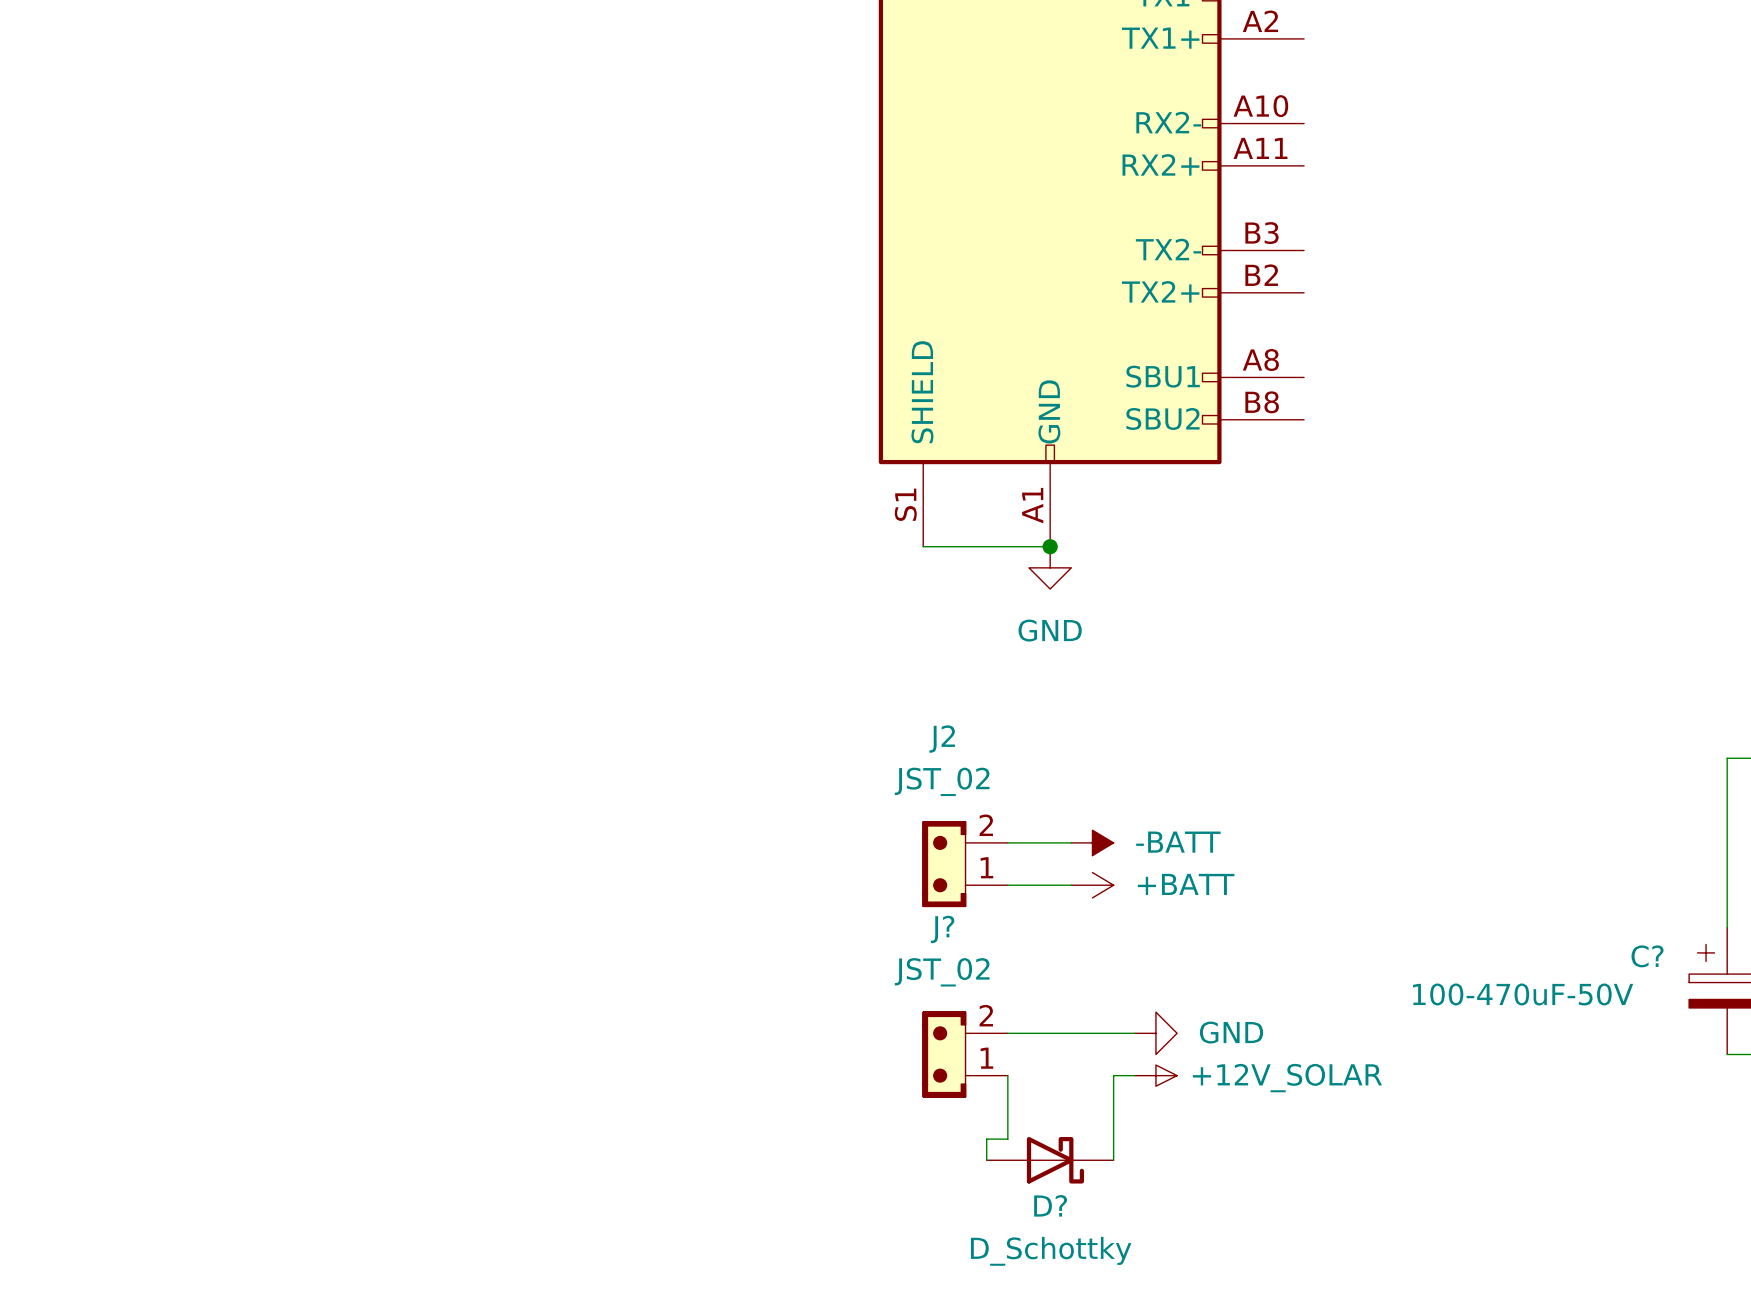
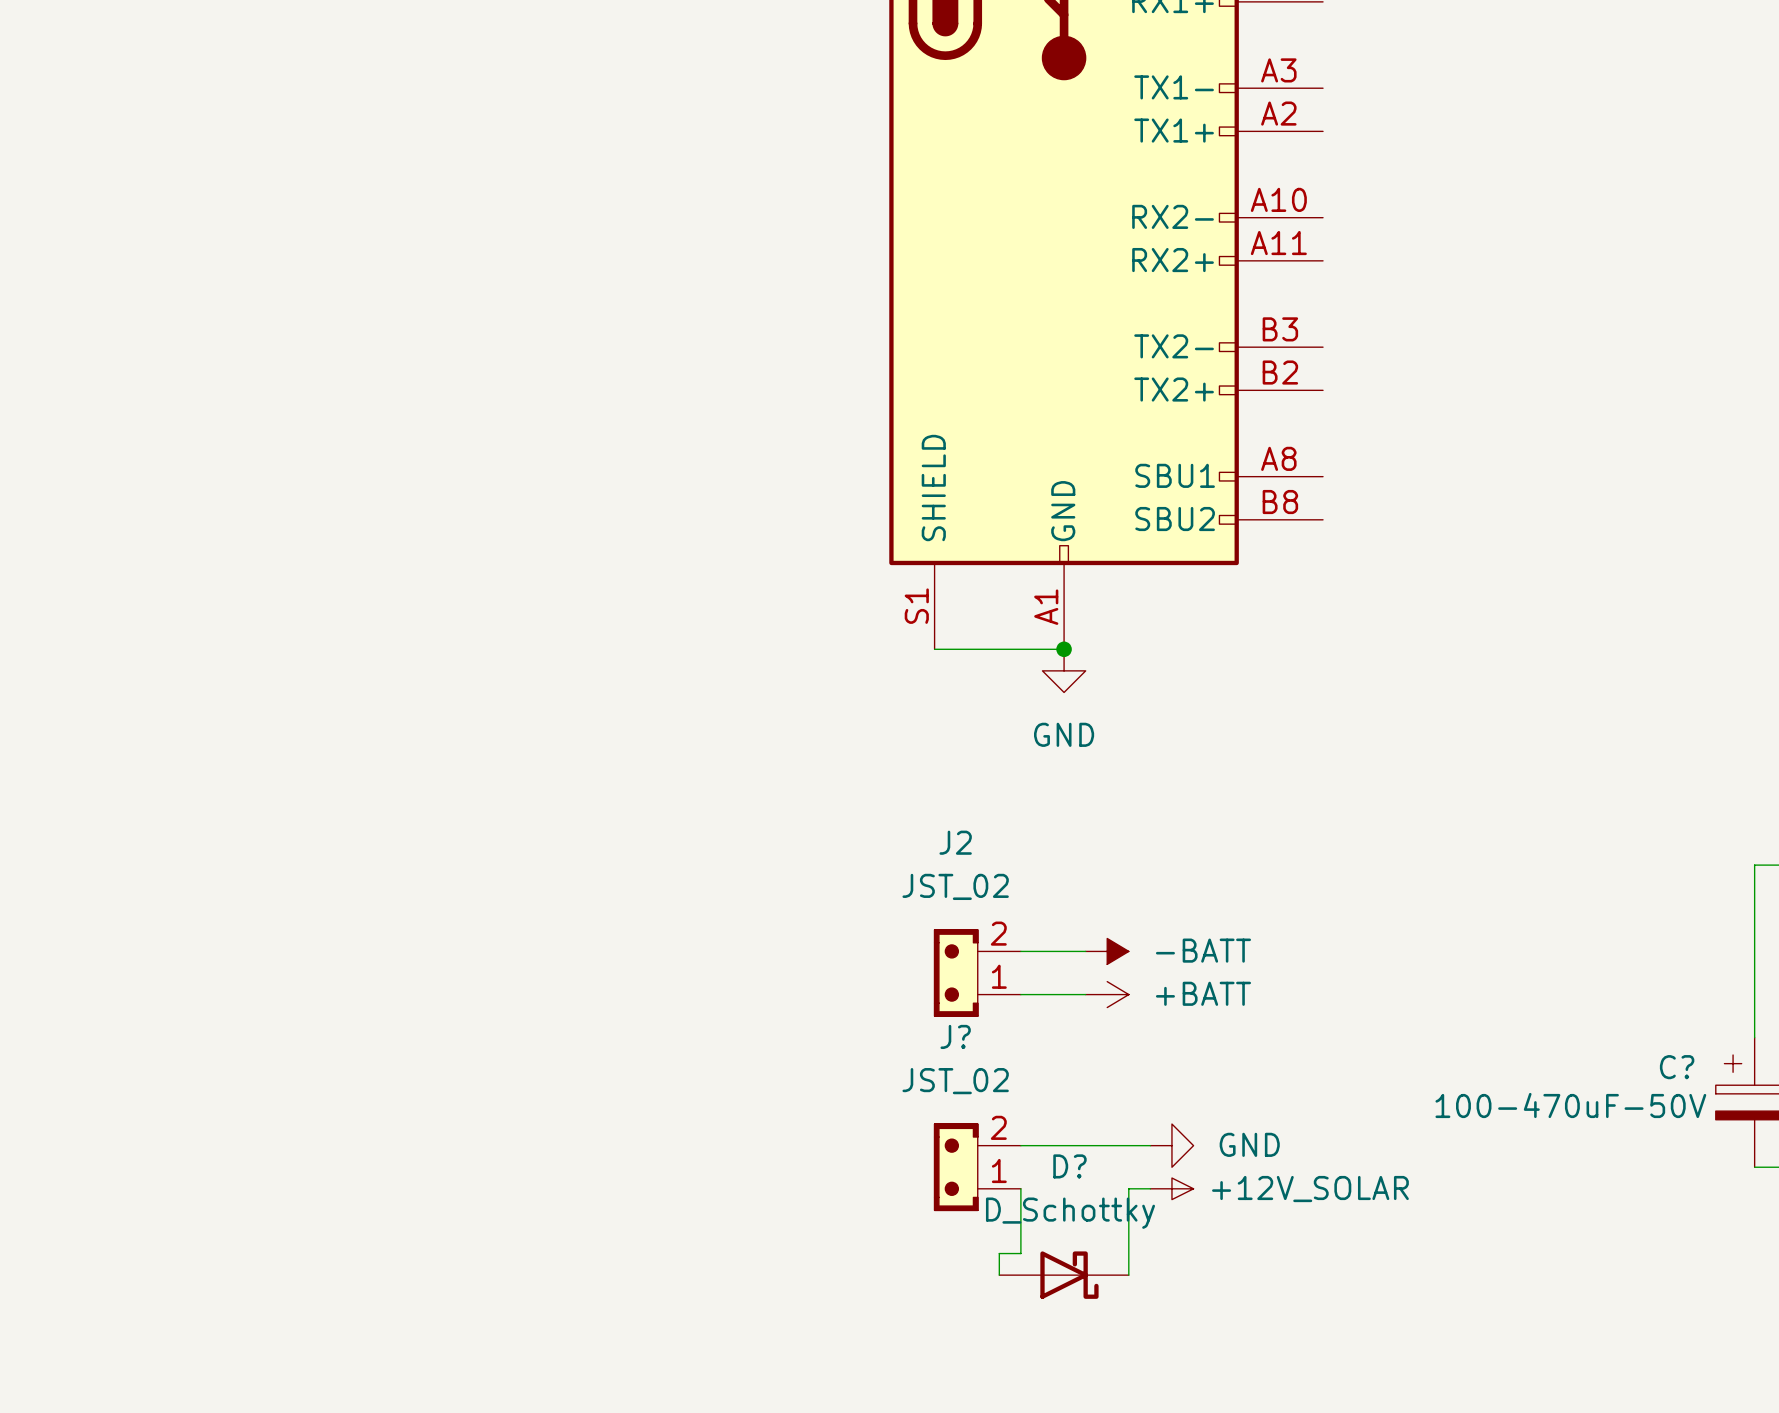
D? name position: D? (1050, 1205) -> D? (1069, 1166)
D? value position: D_Schottky (1051, 1251) -> D_Schottky (1070, 1213)

